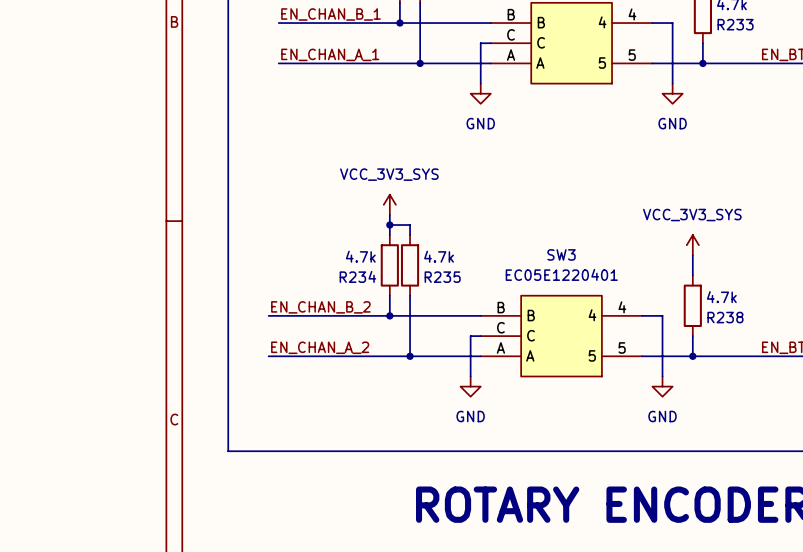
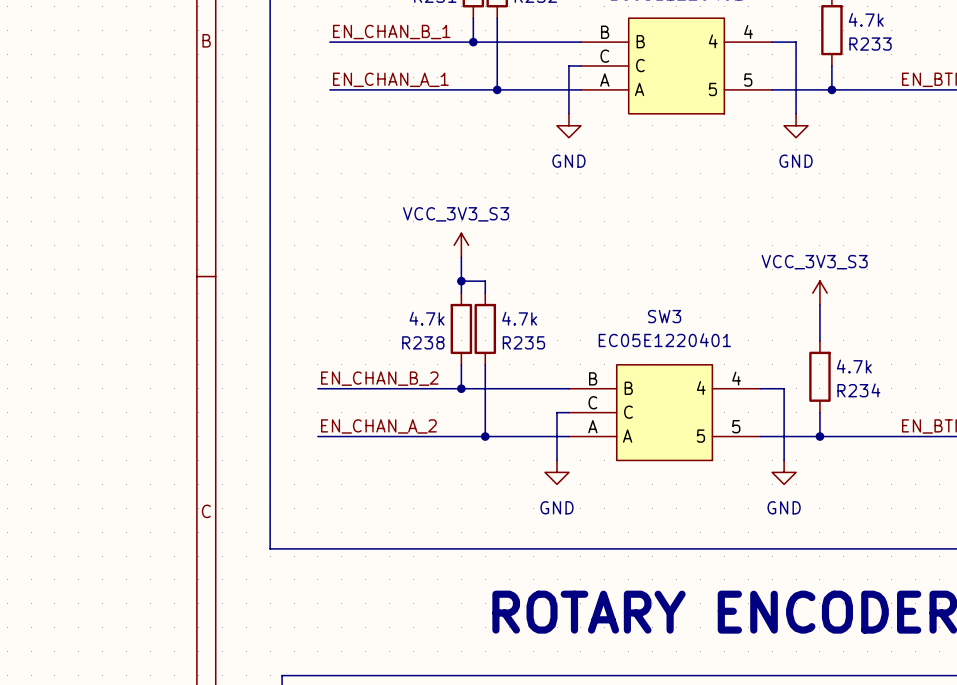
power symbol: none -> VCC_3V3_S3 (461, 245)
power symbol: VCC_3V3_SYS (389, 204) -> none
power symbol: none -> VCC_3V3_S3 (819, 293)
power symbol: VCC_3V3_SYS (692, 245) -> none
R234 name: R234 (357, 276) -> R238 (423, 342)
R238 name: R238 (725, 317) -> R234 (858, 390)

